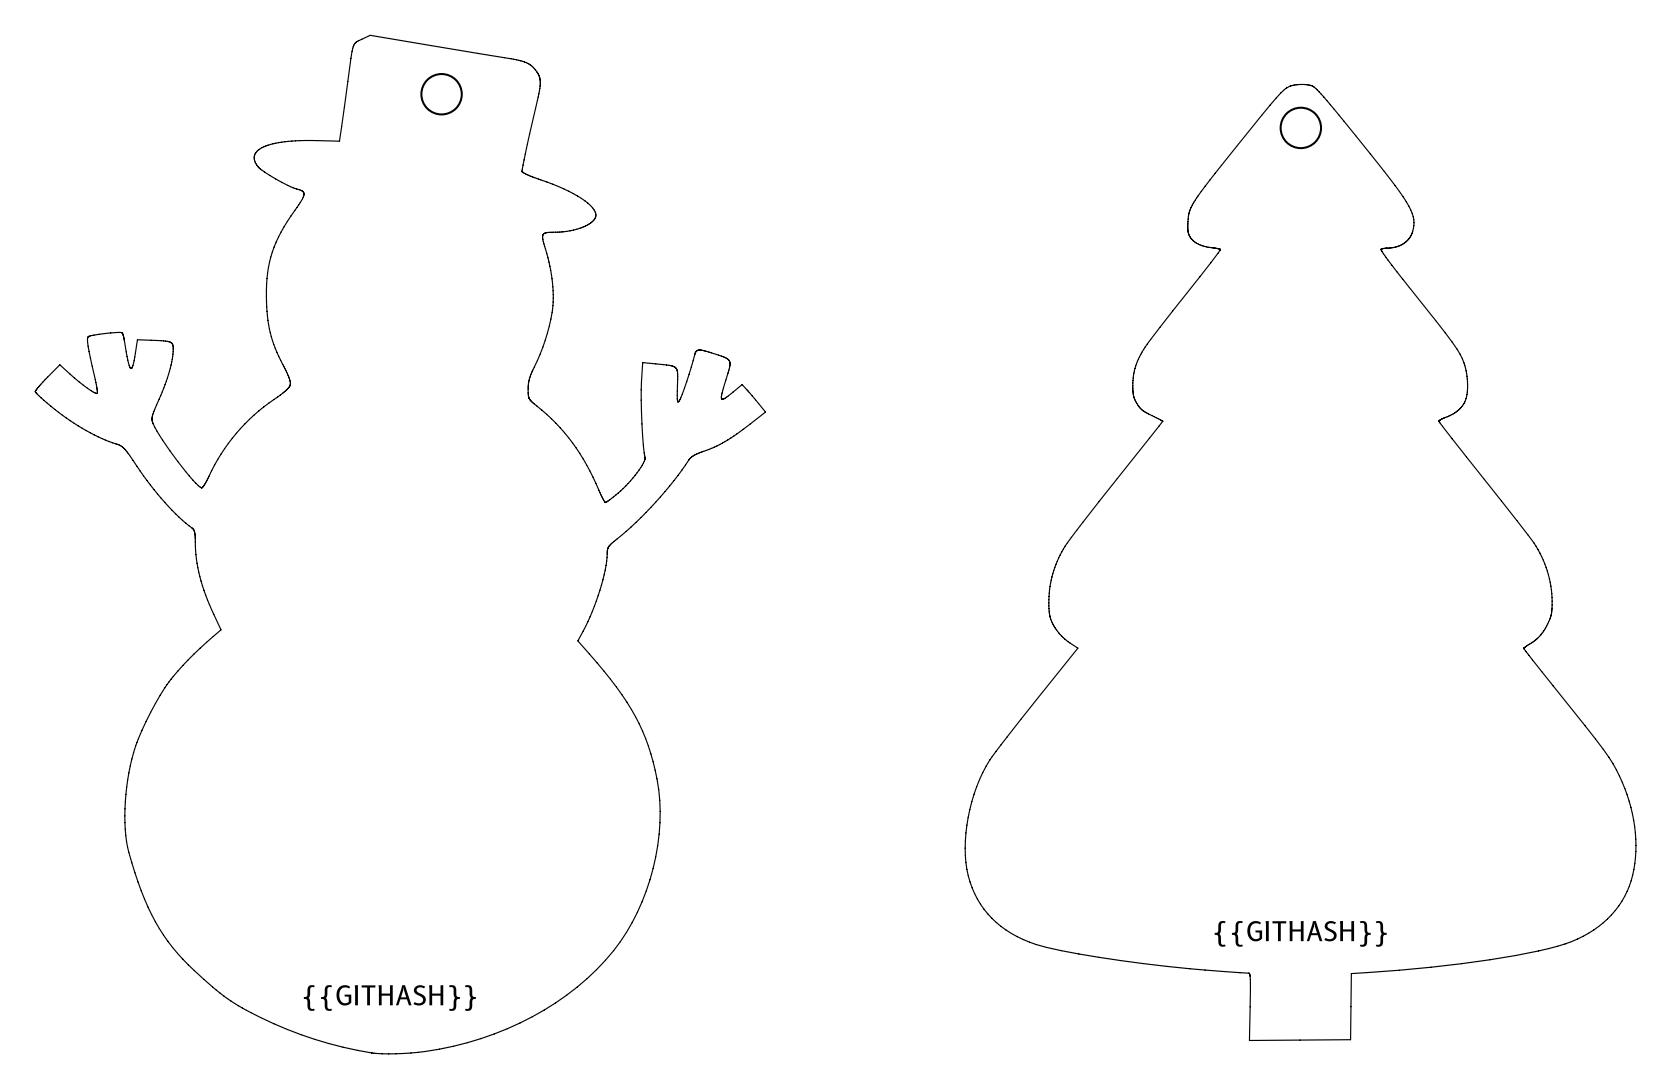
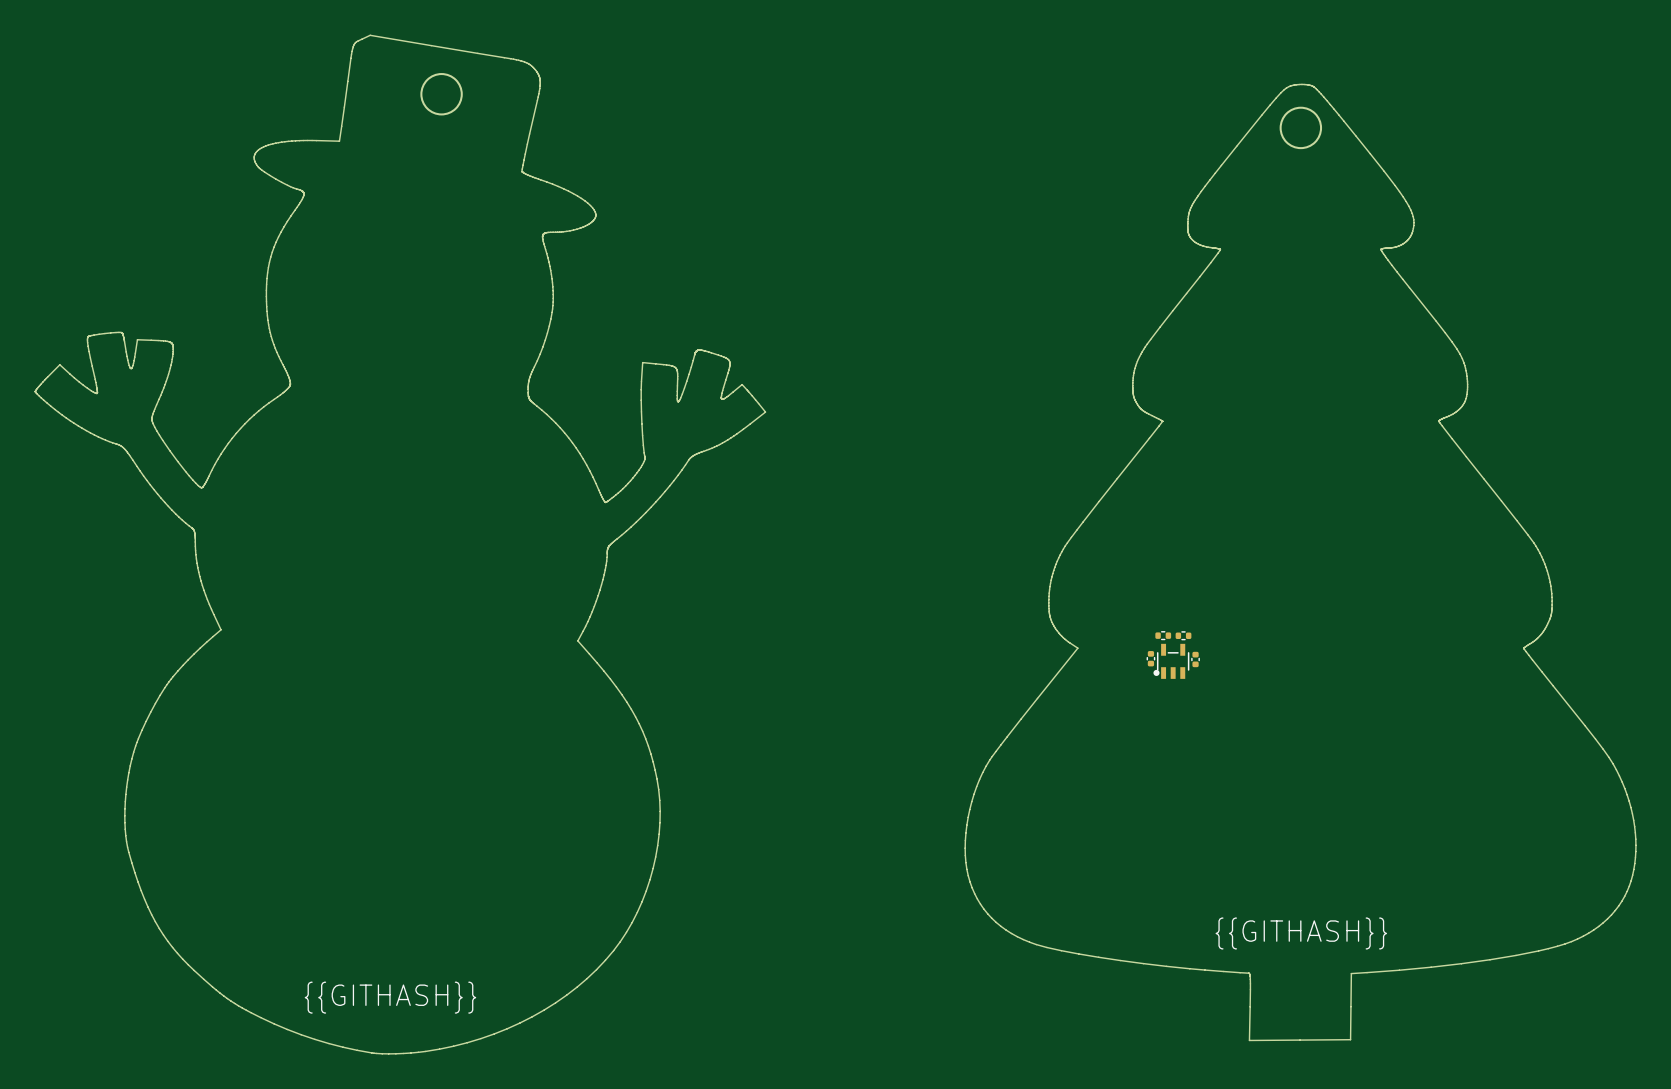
part: none -> (1163, 635)
part: none -> (1183, 635)
part: none -> (1150, 658)
part: none -> (1195, 659)
part: none -> (1171, 661)

